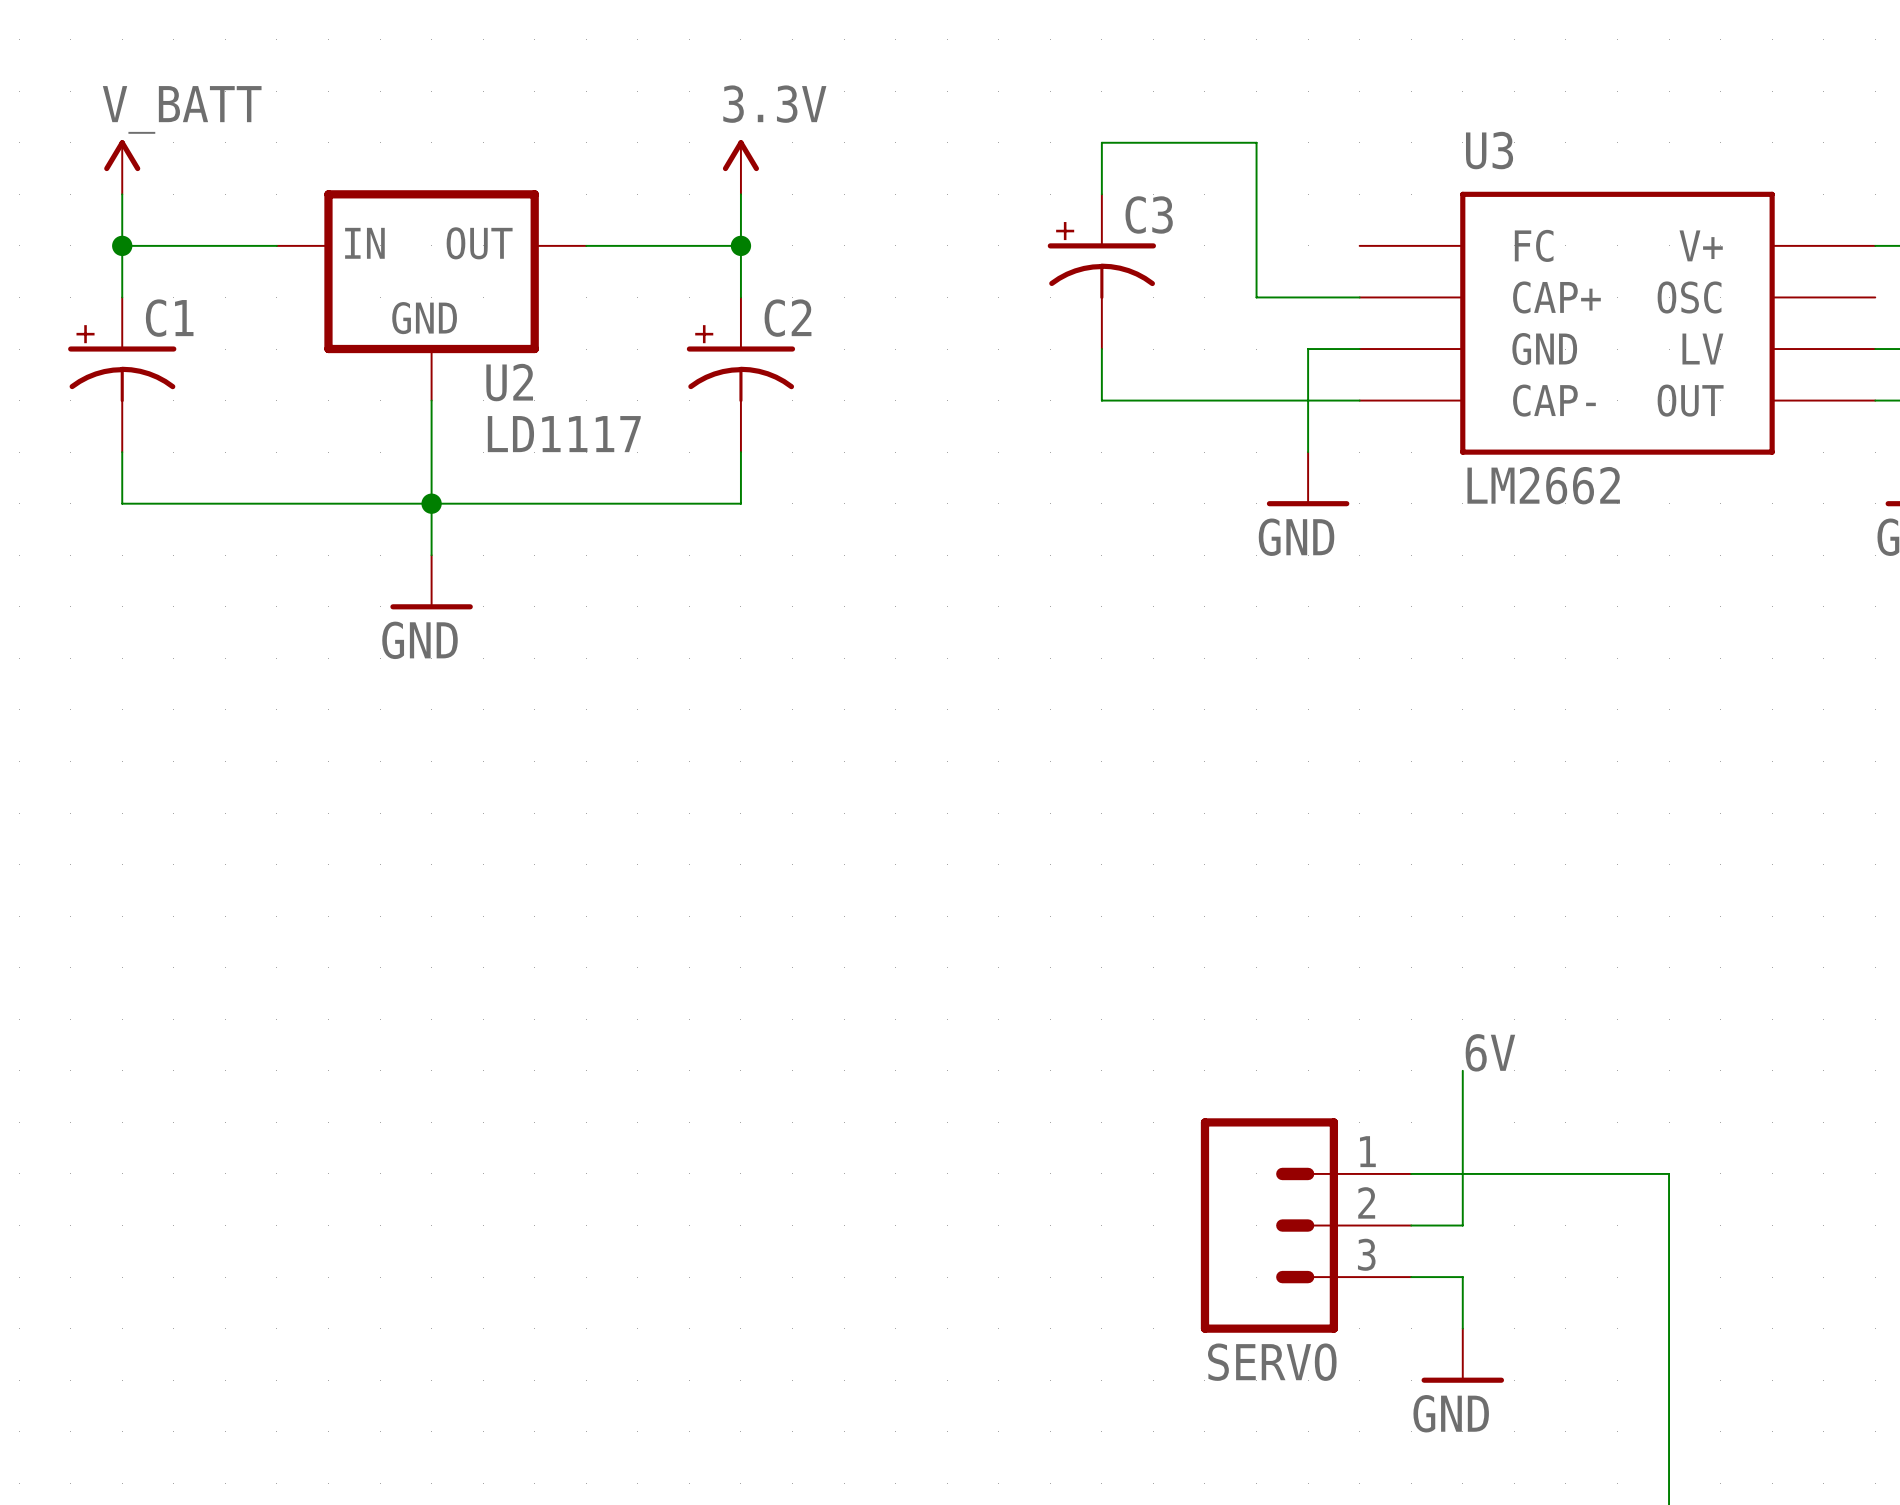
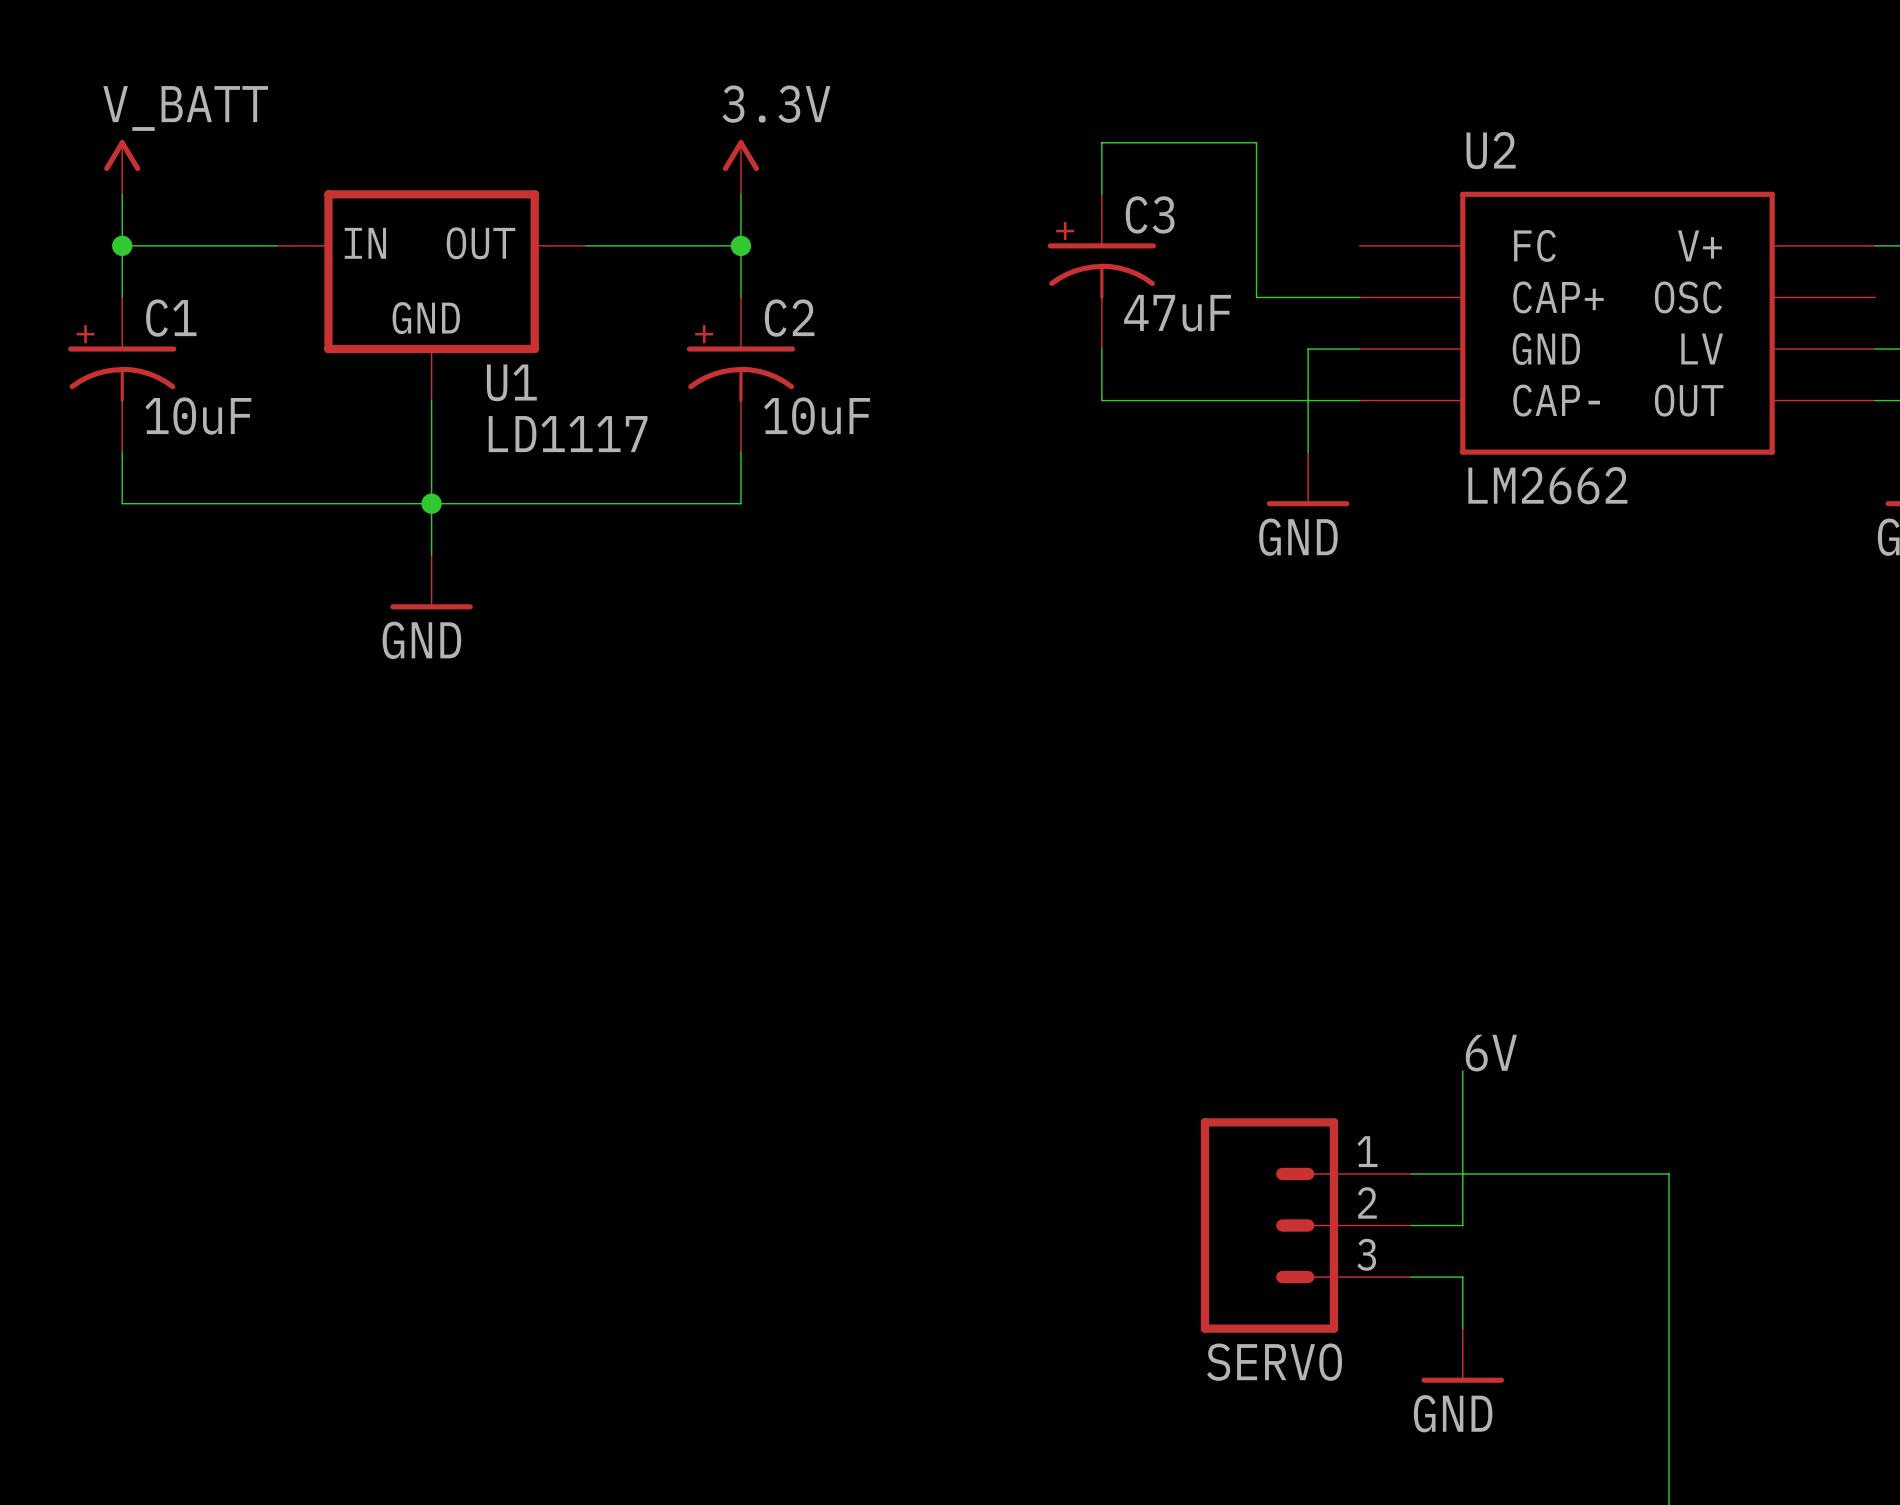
U3 name: U3 (1489, 150) -> U2 (1491, 150)
C3 value: none -> 47uF (1177, 313)
U2 name: U2 (509, 382) -> U1 (511, 382)
C1 value: none -> 10uF (198, 416)
C2 value: none -> 10uF (817, 416)

